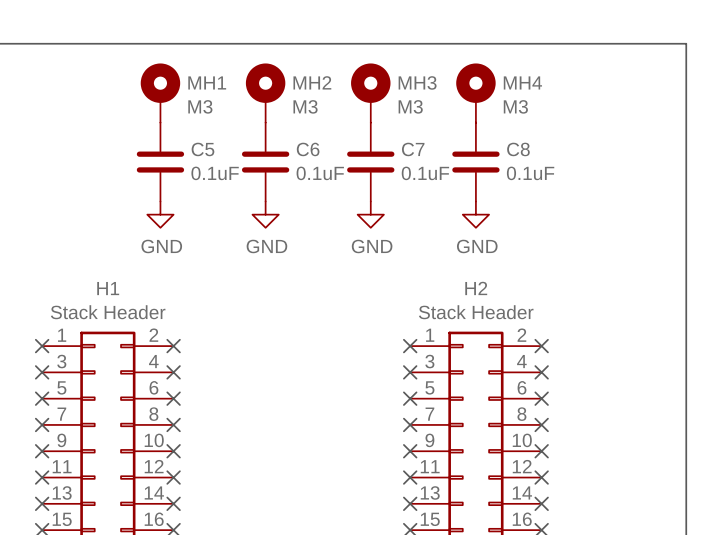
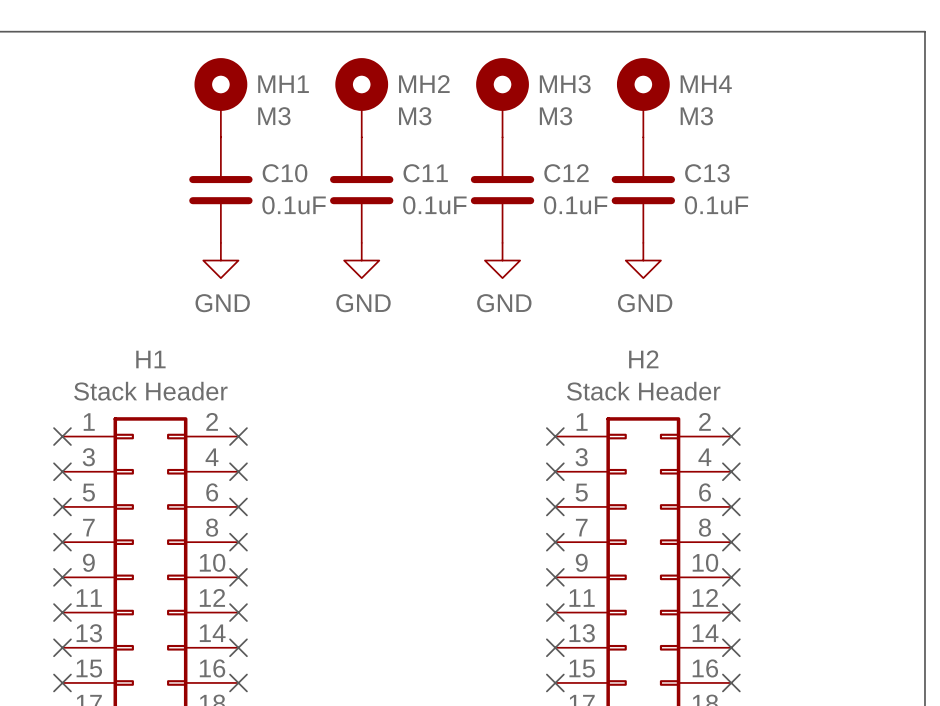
C5 name: C5 (202, 149) -> C10 (285, 173)
C6 name: C6 (308, 149) -> C11 (425, 173)
C7 name: C7 (413, 149) -> C12 (566, 173)
C8 name: C8 (518, 149) -> C13 (707, 173)

